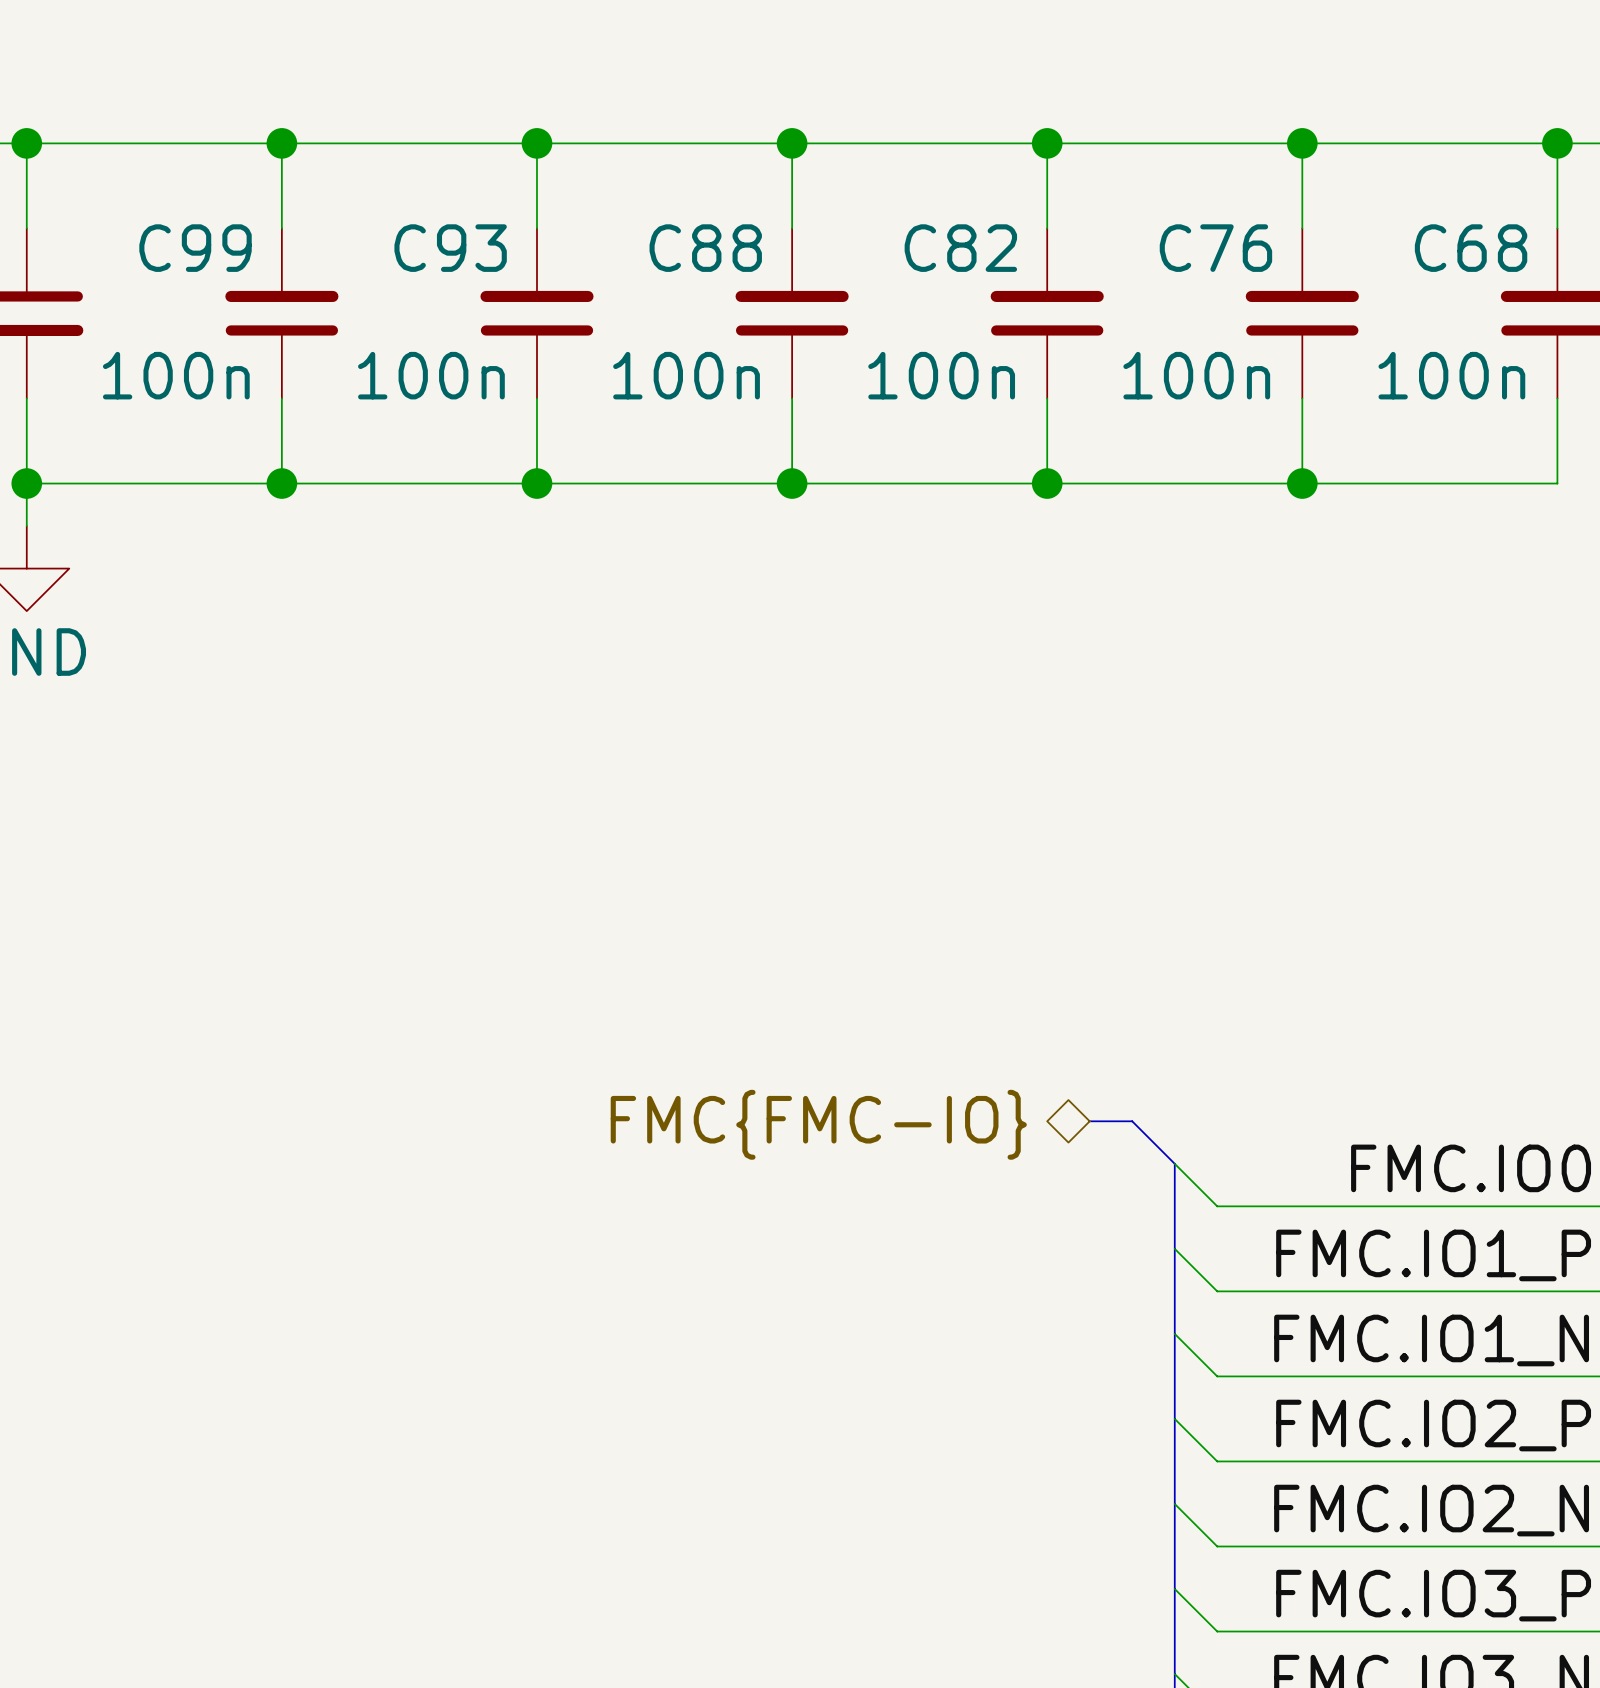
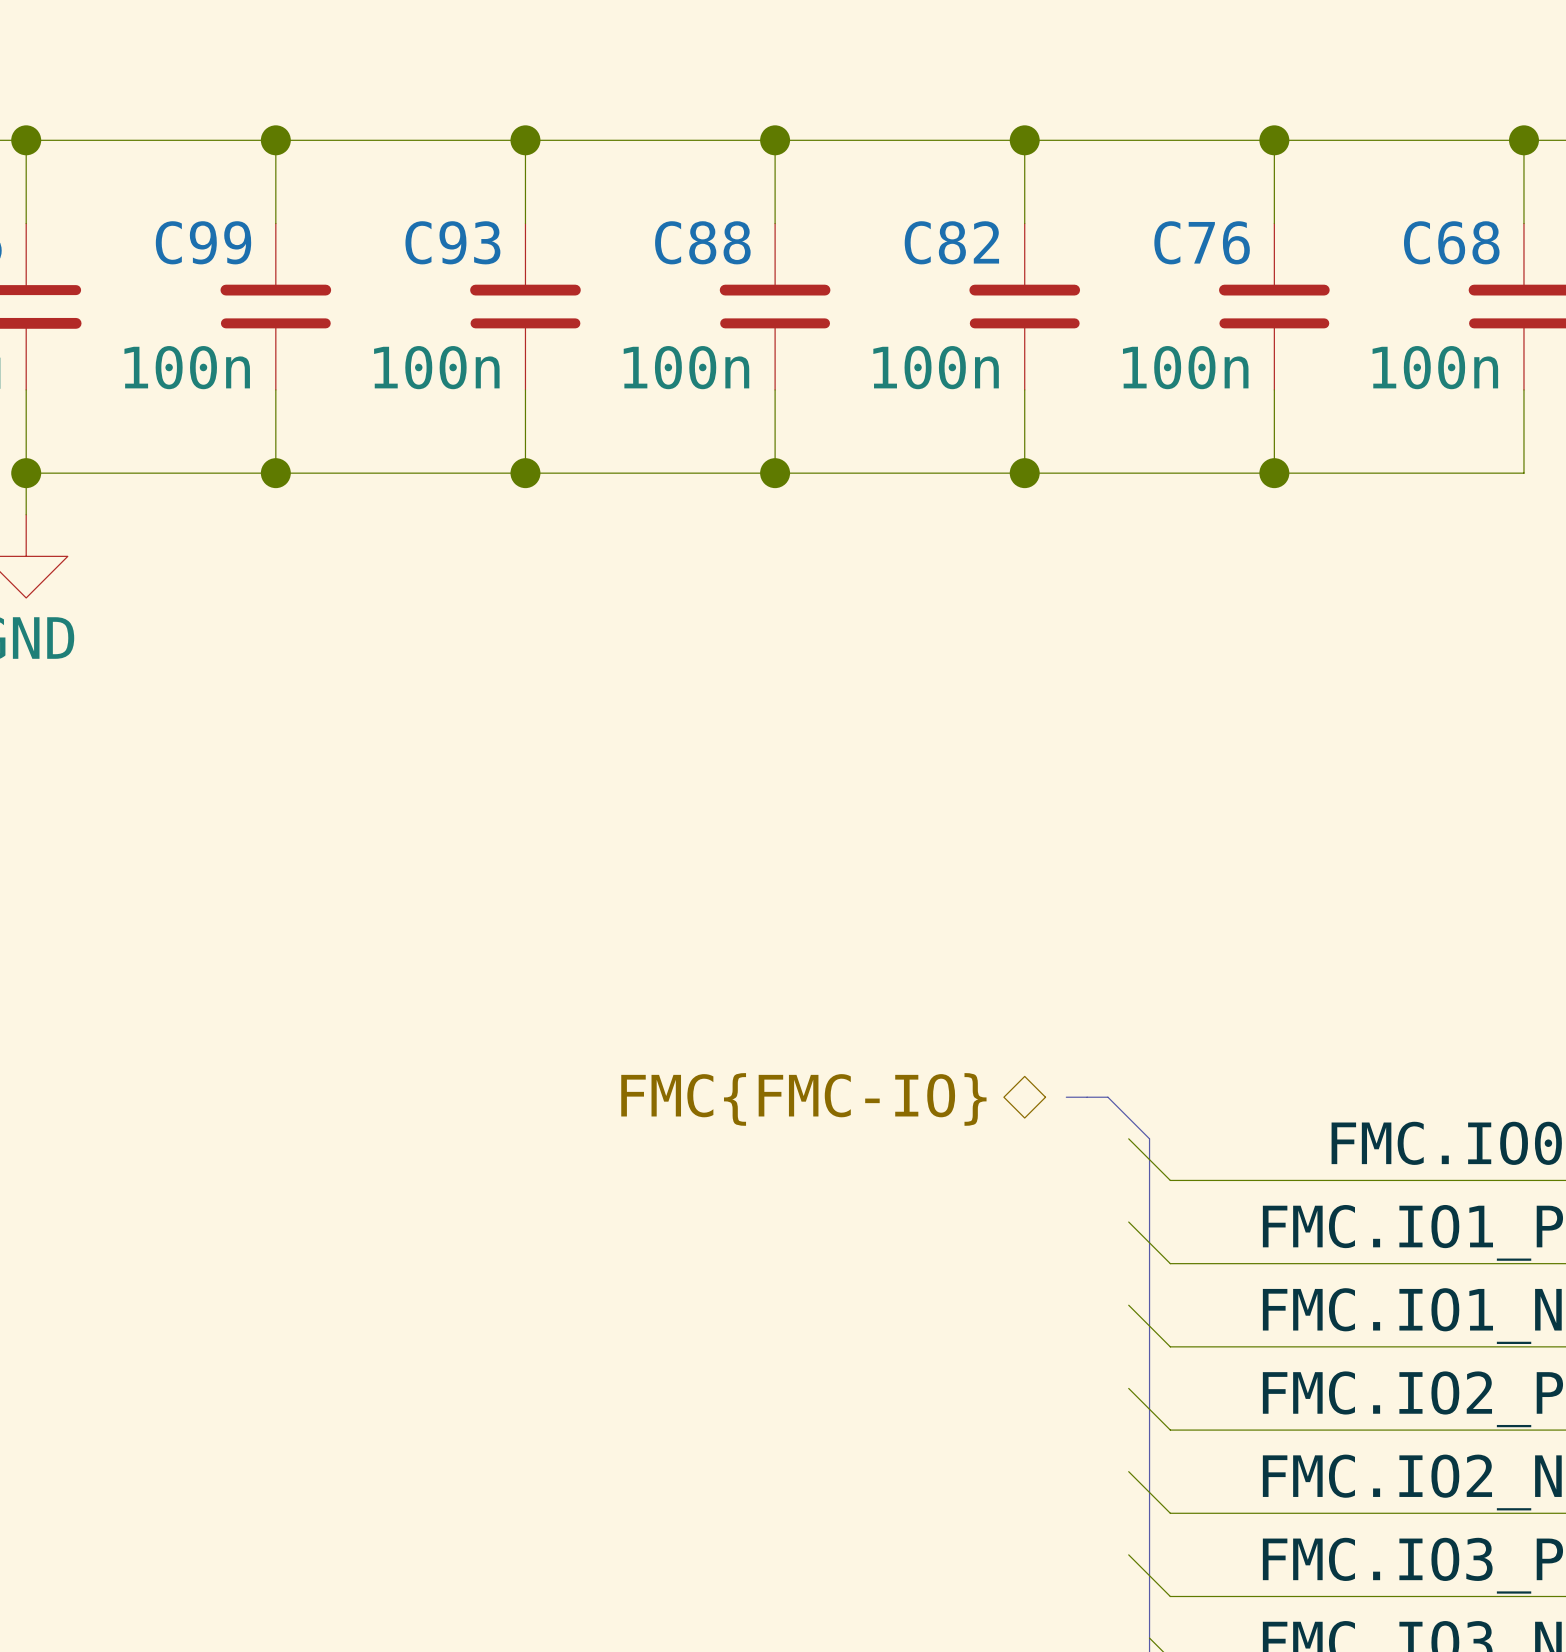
hierarchical label position: FMC{FMC-IO} (818, 1124) -> FMC{FMC-IO} (803, 1099)
wire: (1174, 1163) (1217, 1206) -> (1128, 1138) (1170, 1180) (1191, 1180)
wire: (1174, 1248) (1217, 1291) -> (1128, 1222) (1170, 1263) (1191, 1263)
wire: (1174, 1333) (1217, 1376) -> (1128, 1305) (1170, 1346) (1191, 1346)
wire: (1174, 1418) (1217, 1461) -> (1128, 1388) (1170, 1430) (1191, 1430)
wire: (1174, 1503) (1217, 1546) -> (1128, 1471) (1170, 1513) (1191, 1513)
wire: (1174, 1589) (1217, 1631) -> (1128, 1554) (1170, 1596) (1191, 1596)

